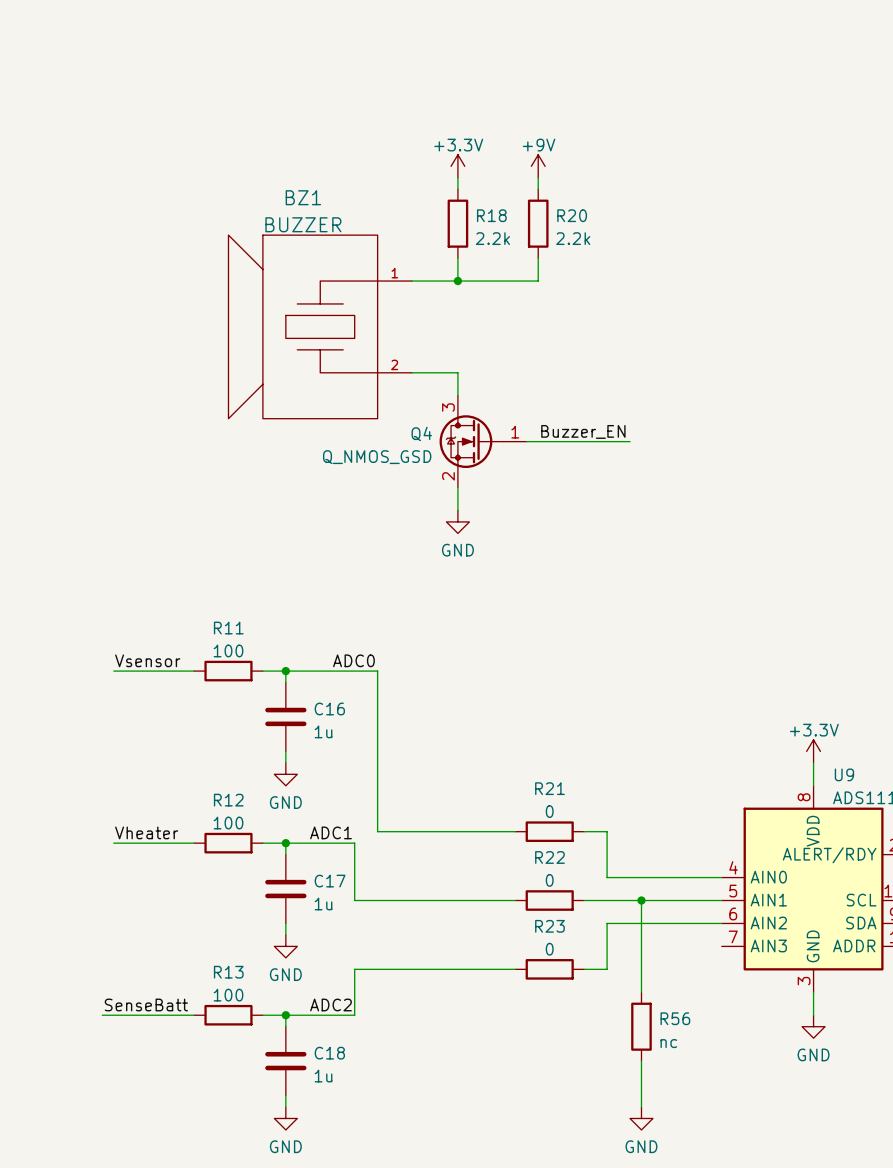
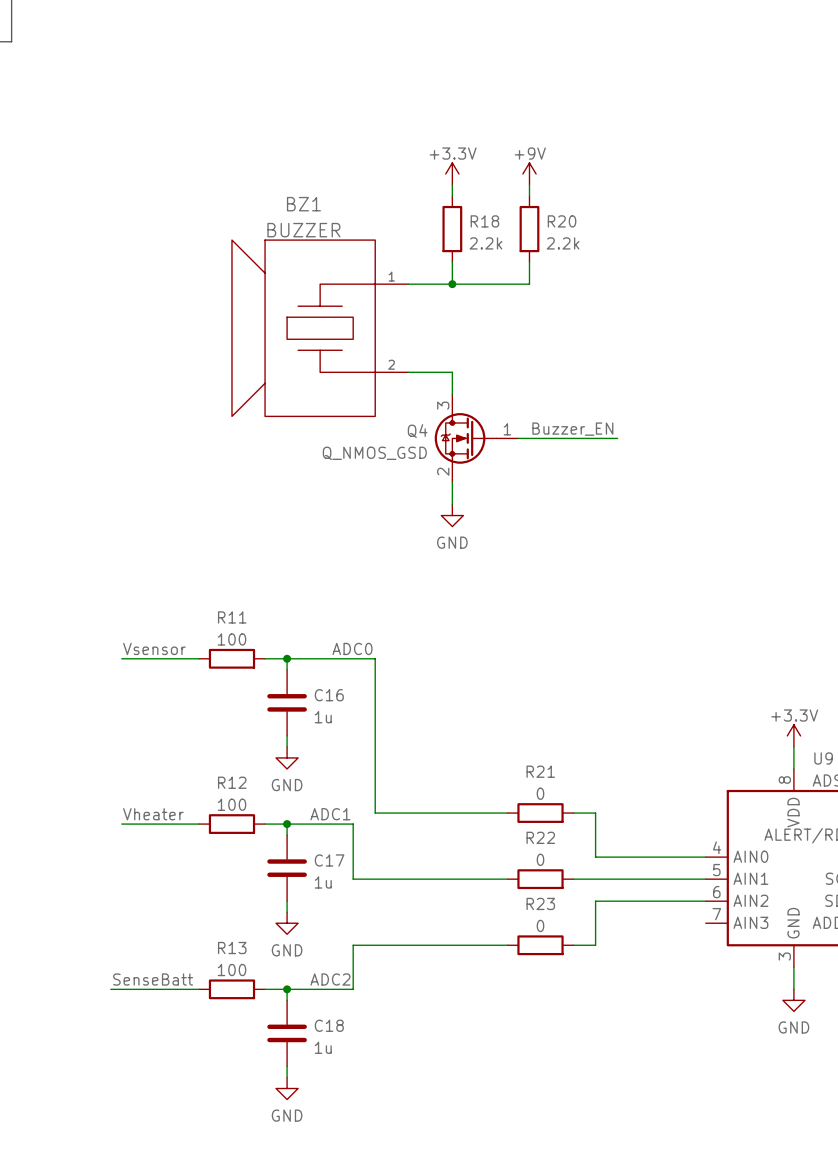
wire: (641, 900) (641, 992) -> none
junction: (641, 900) -> none
R56: nc (641, 1026) -> none
wire: (641, 1061) (641, 1107) -> none
power symbol: GND (641, 1118) -> none

